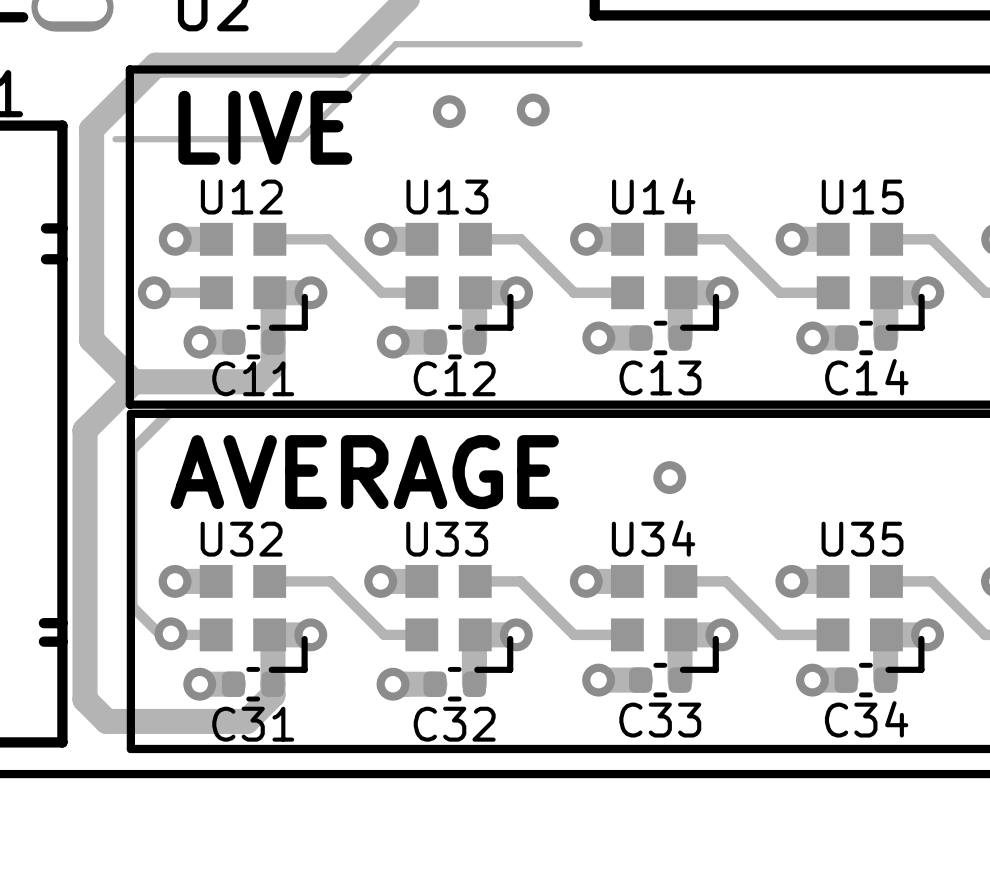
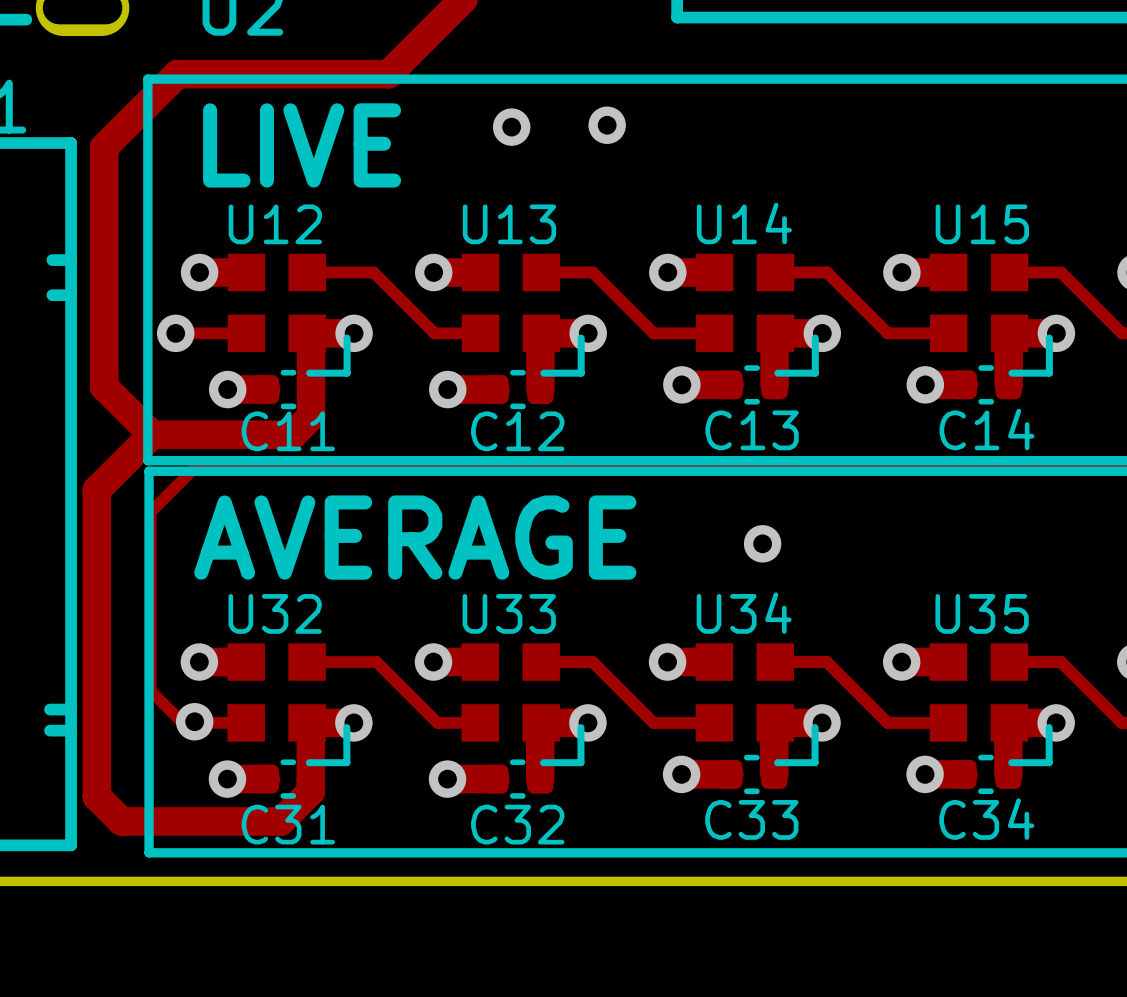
track: (579, 44) (395, 44) (300, 139) (115, 139) -> none

